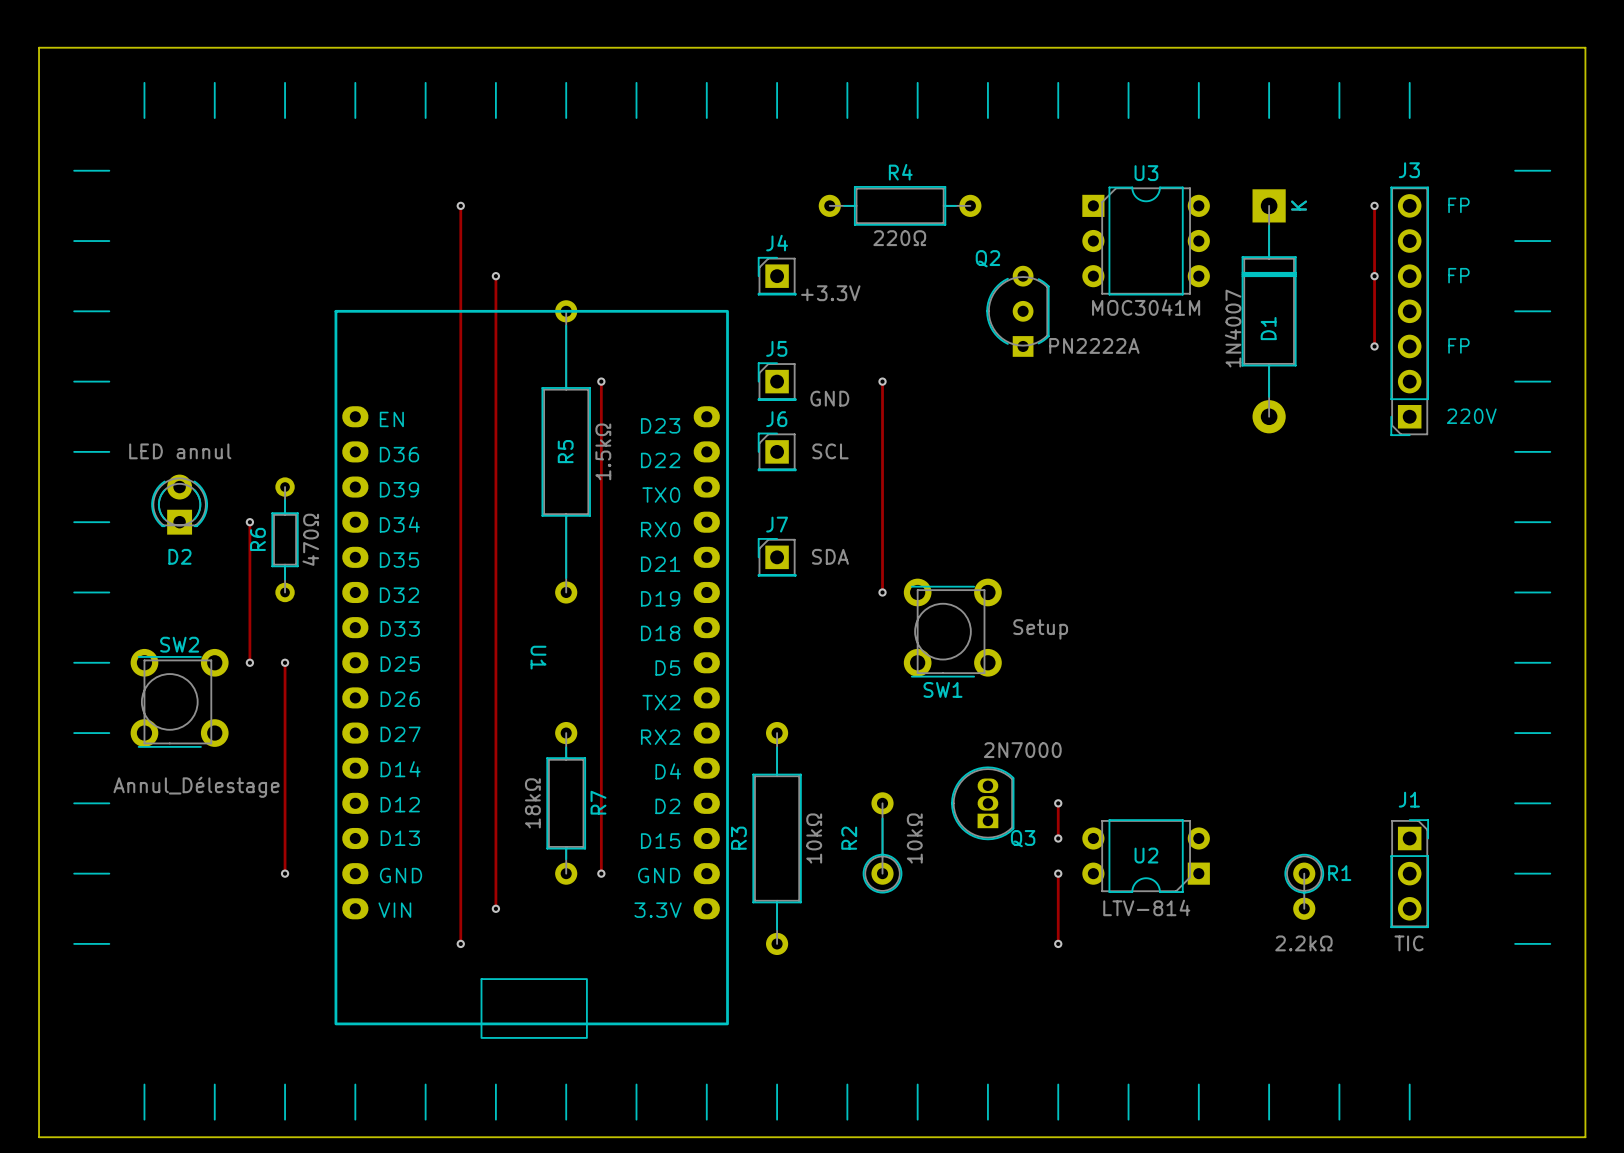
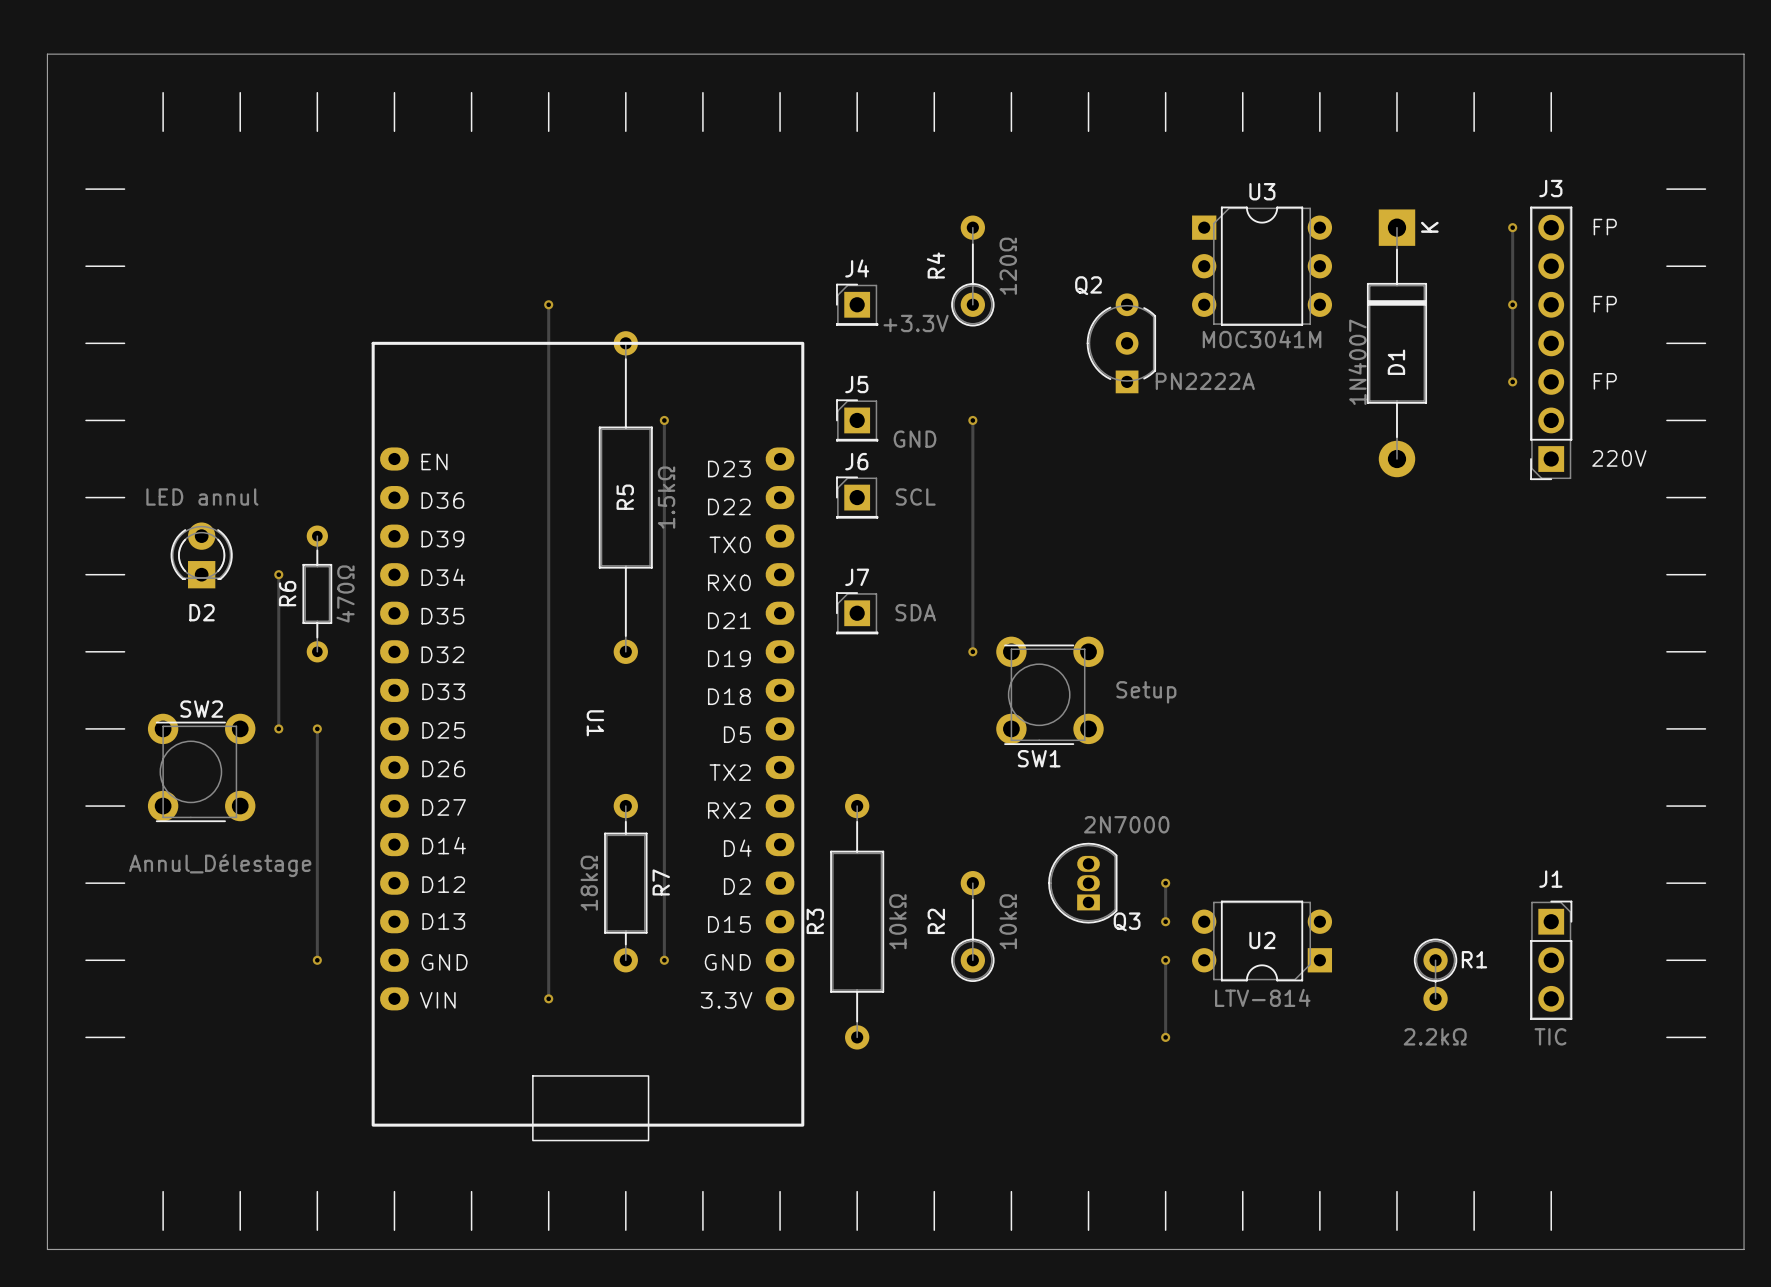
R4 name position: R4 (900, 172) -> R4 (935, 265)
R4 footprint: [818, 186, 982, 226] -> [951, 215, 995, 327]
track: (460, 205) (460, 943) -> none
via: (460, 205) -> none
R4 value: 220Ω (899, 238) -> 120Ω (1008, 266)
via: (460, 943) -> none

